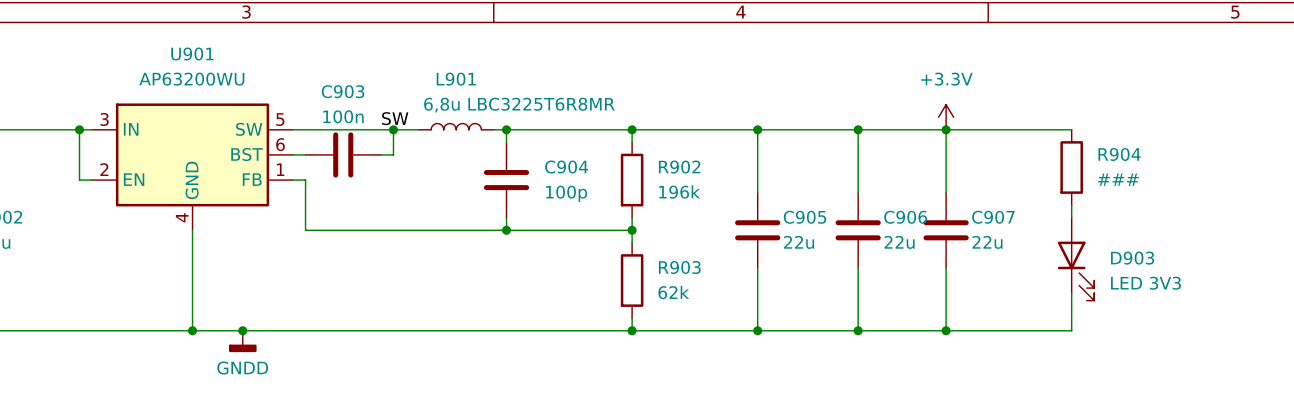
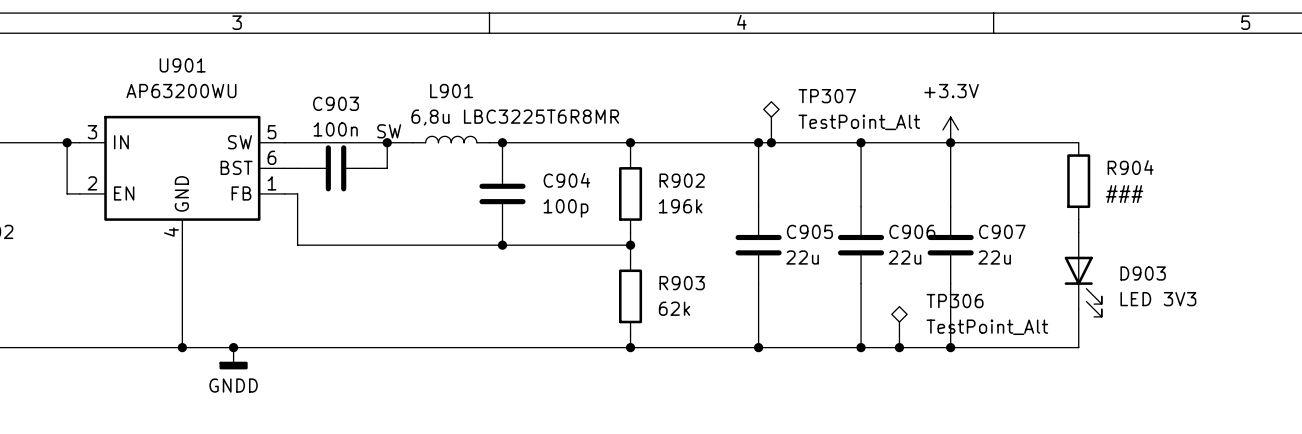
TP307: none -> TestPoint_Alt (771, 122)
junction: none -> (771, 142)
TP306: none -> TestPoint_Alt (899, 327)
junction: none -> (899, 347)

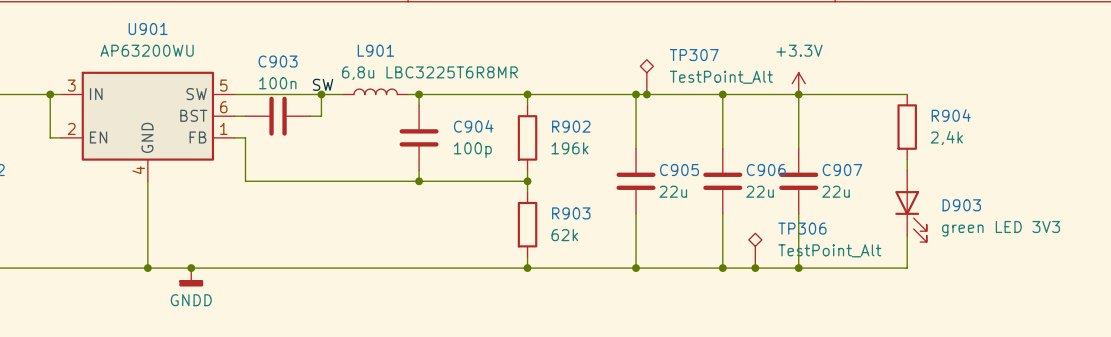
R904 value: ### (1124, 194) -> 2,4k (946, 138)
D903 value: LED 3V3 (1158, 299) -> green LED 3V3 (1001, 228)

